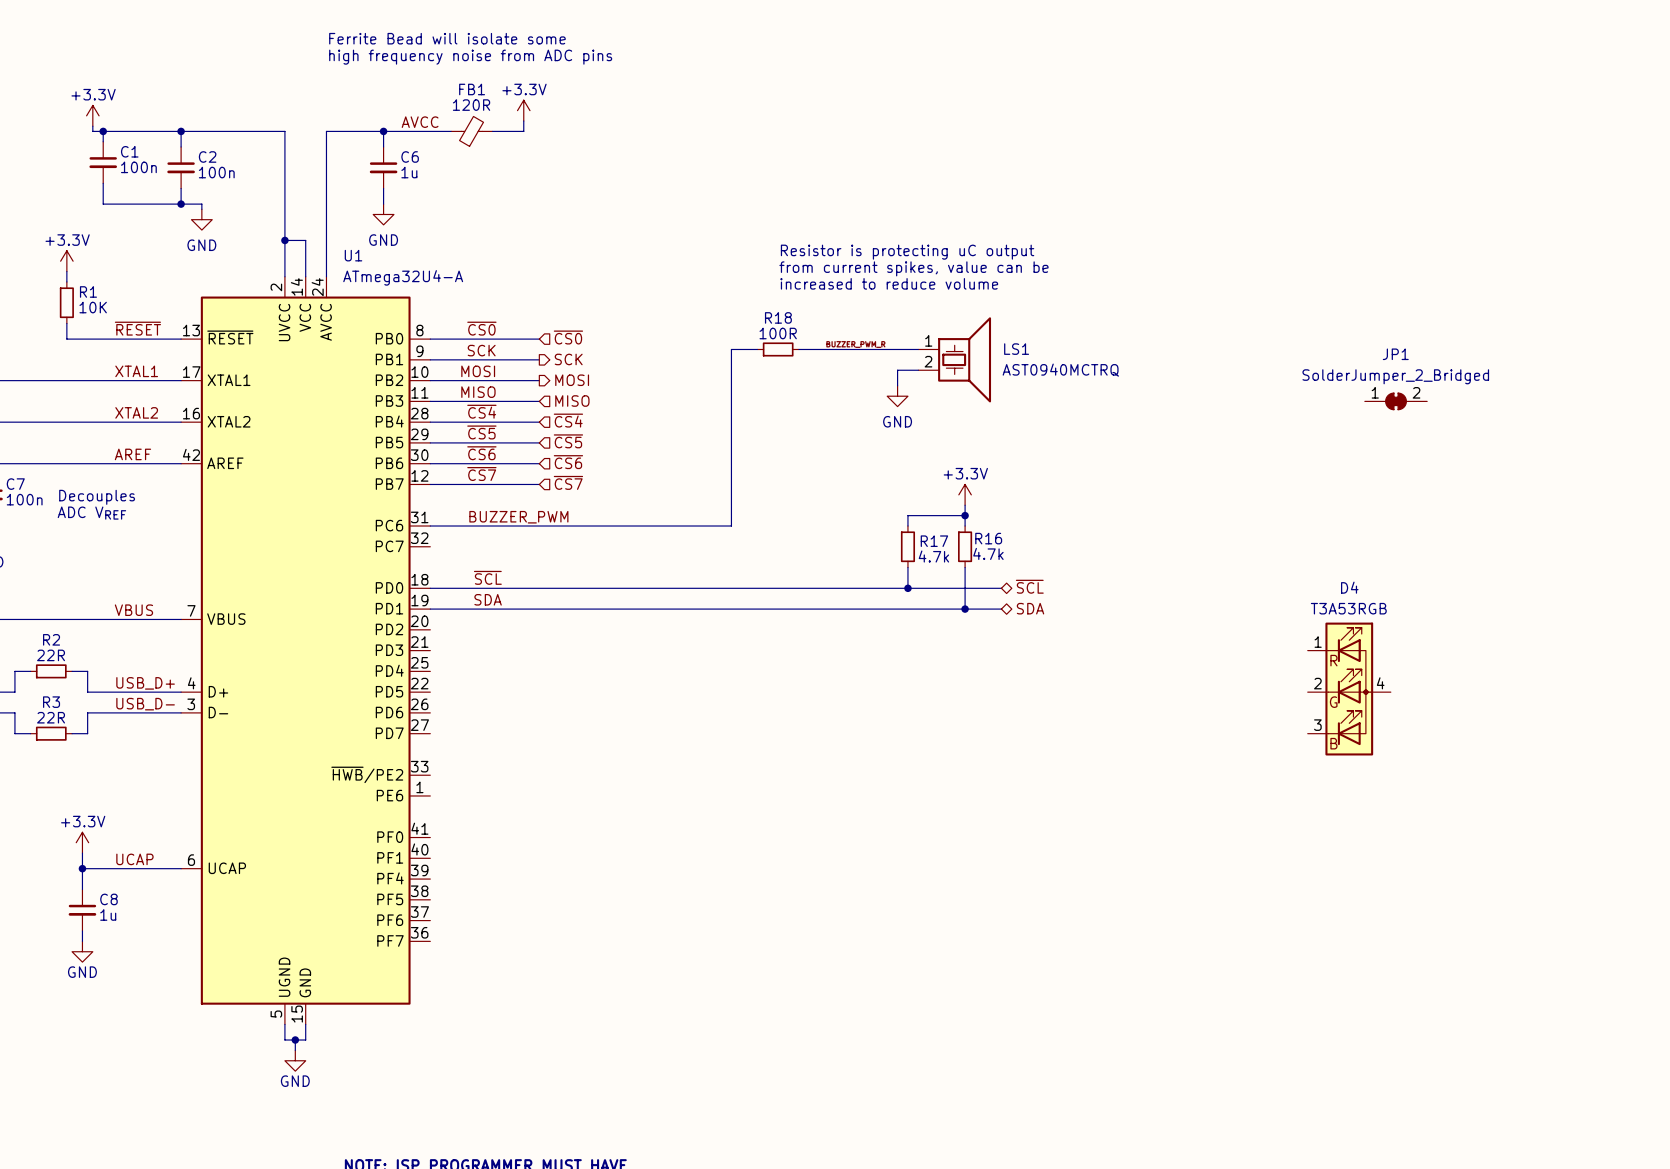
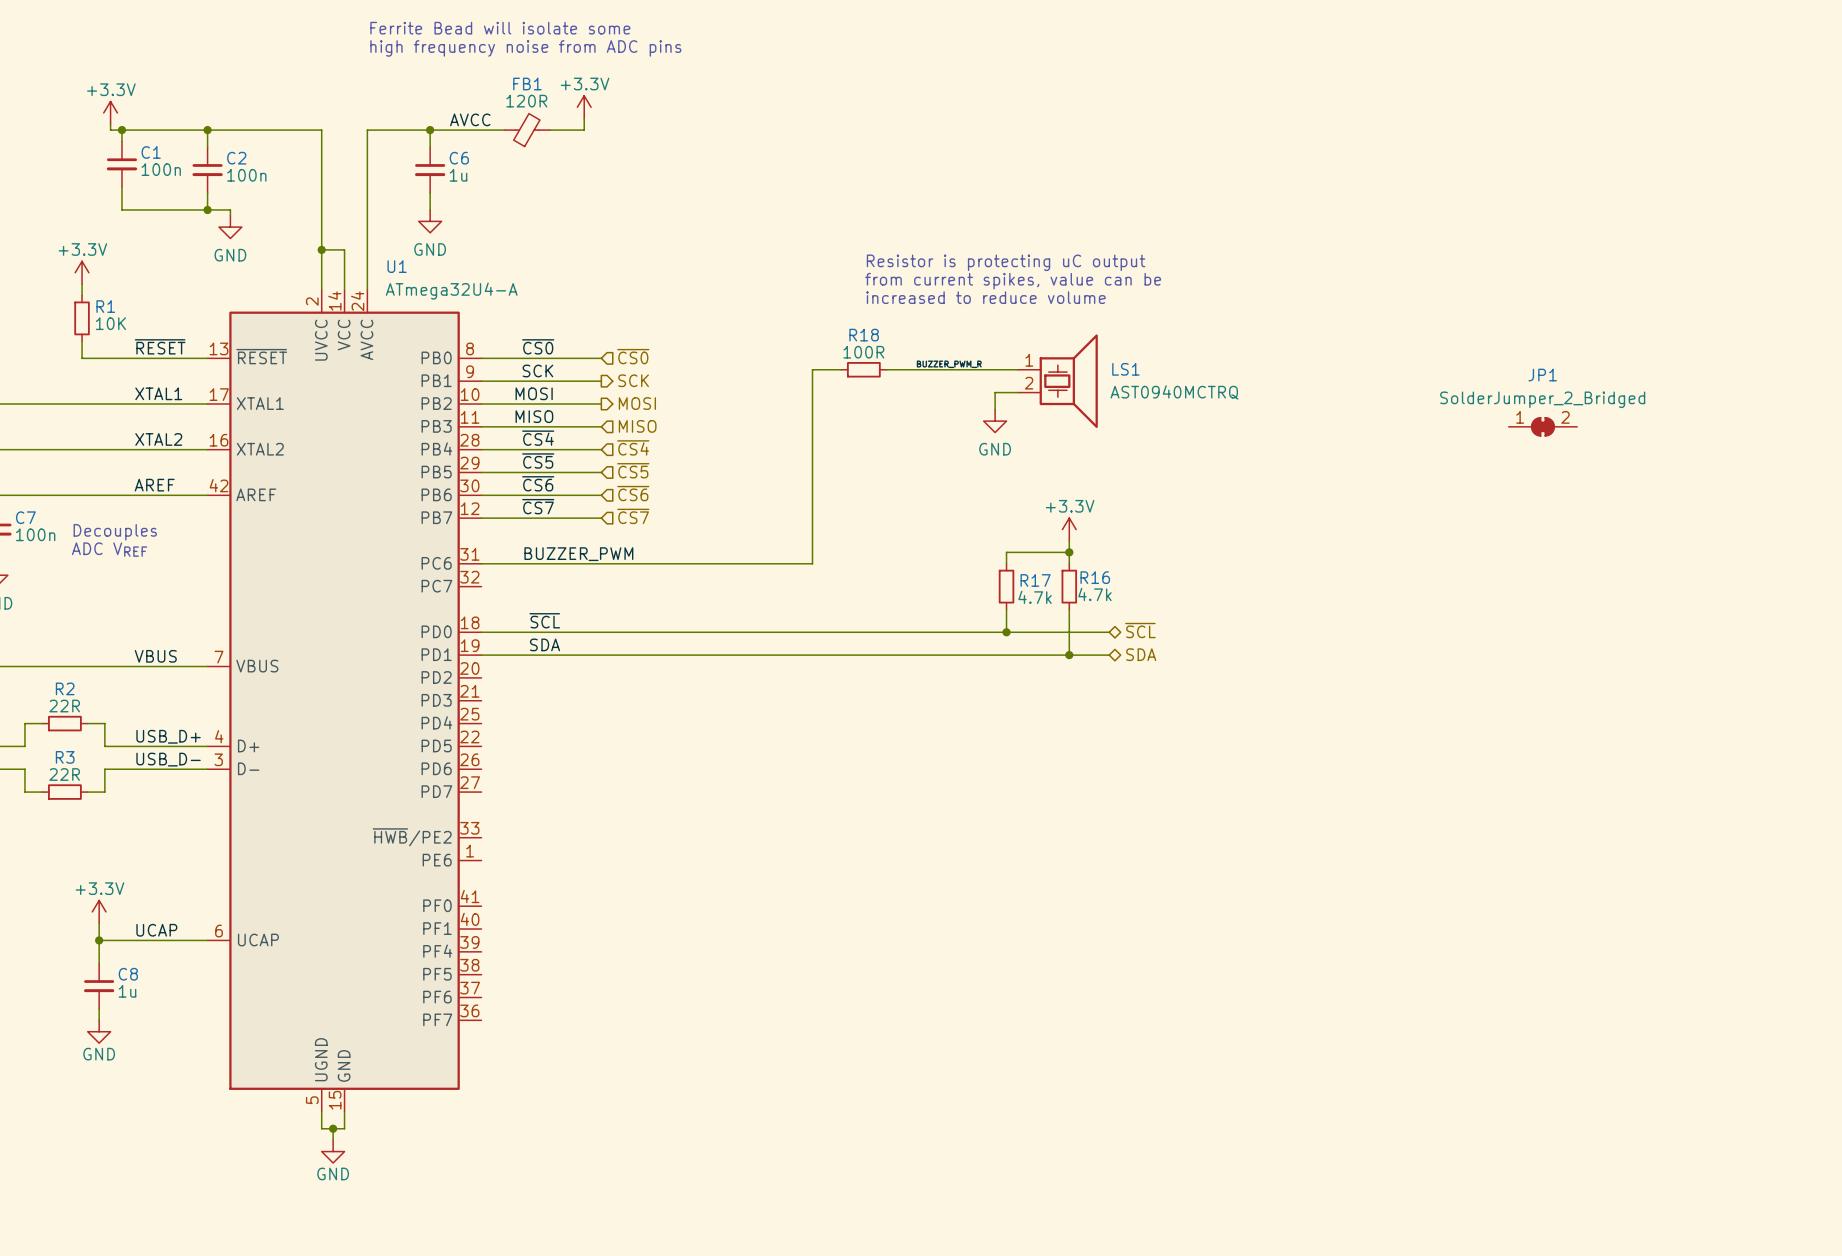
D4: T3A53RGB (1349, 689) -> none

